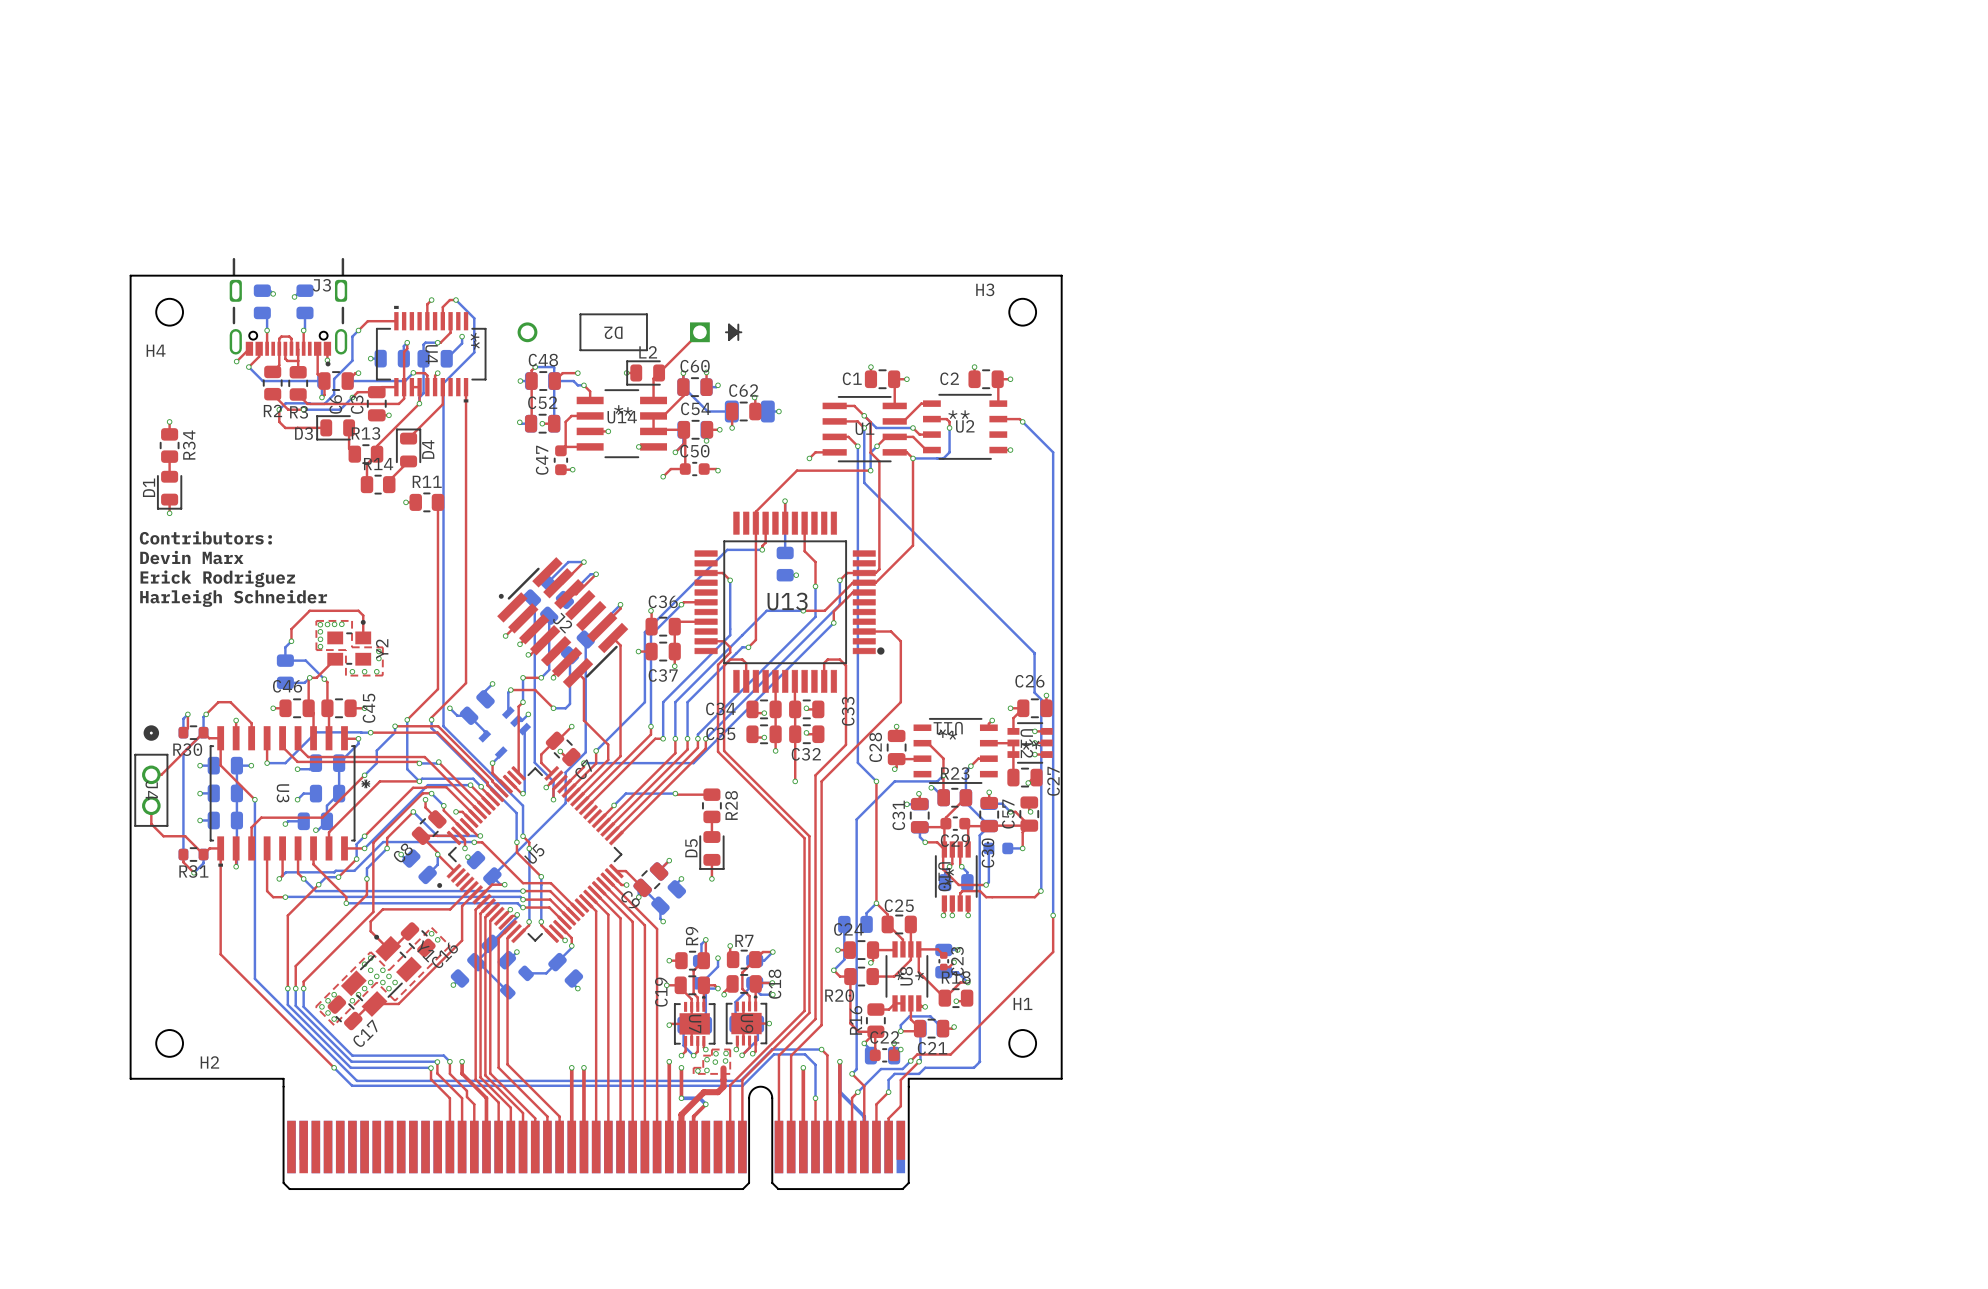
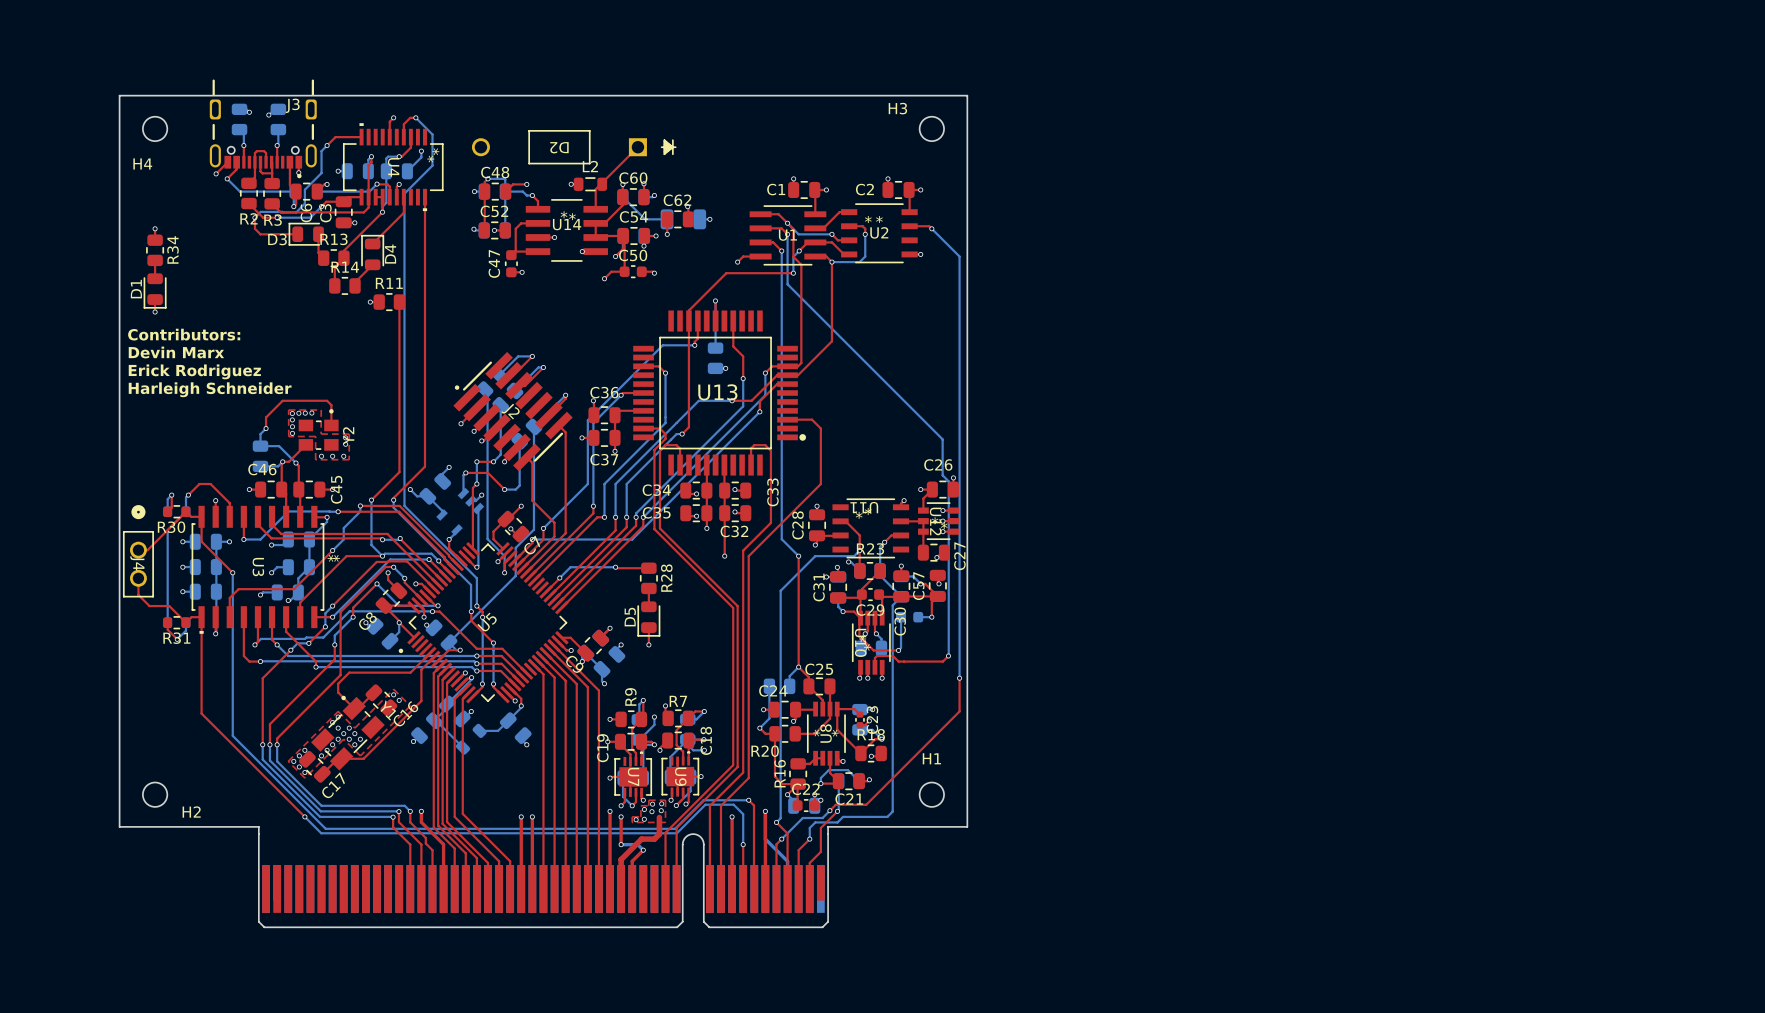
L2 footprint: [626, 360, 666, 386] -> [573, 177, 608, 192]

